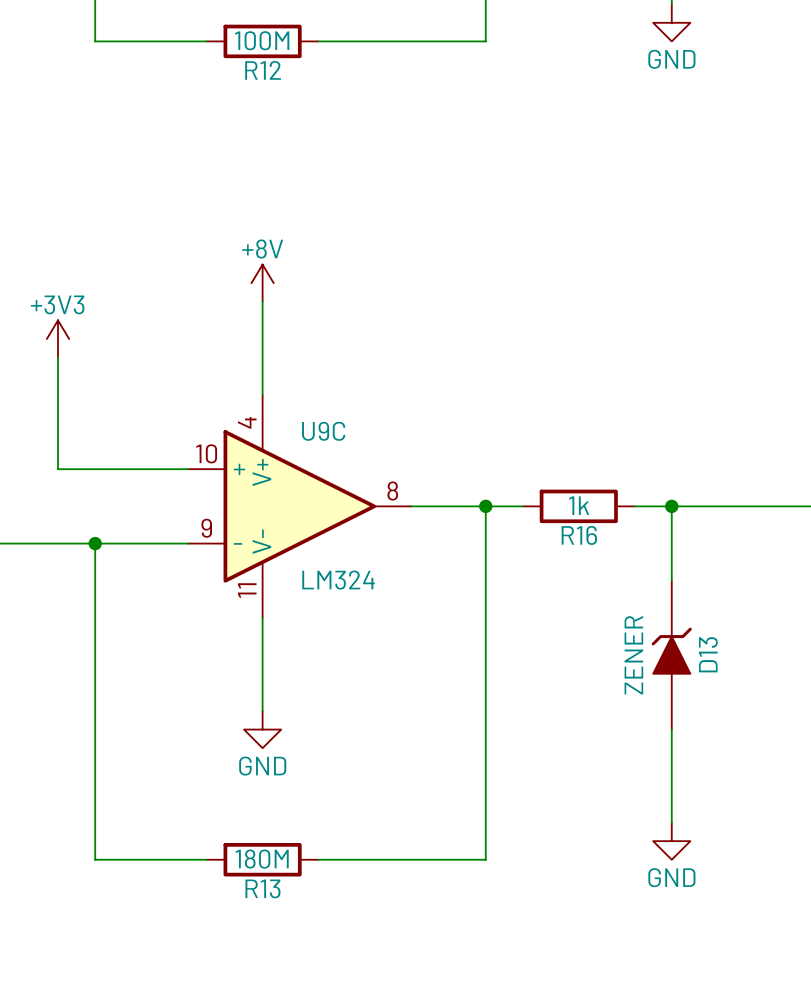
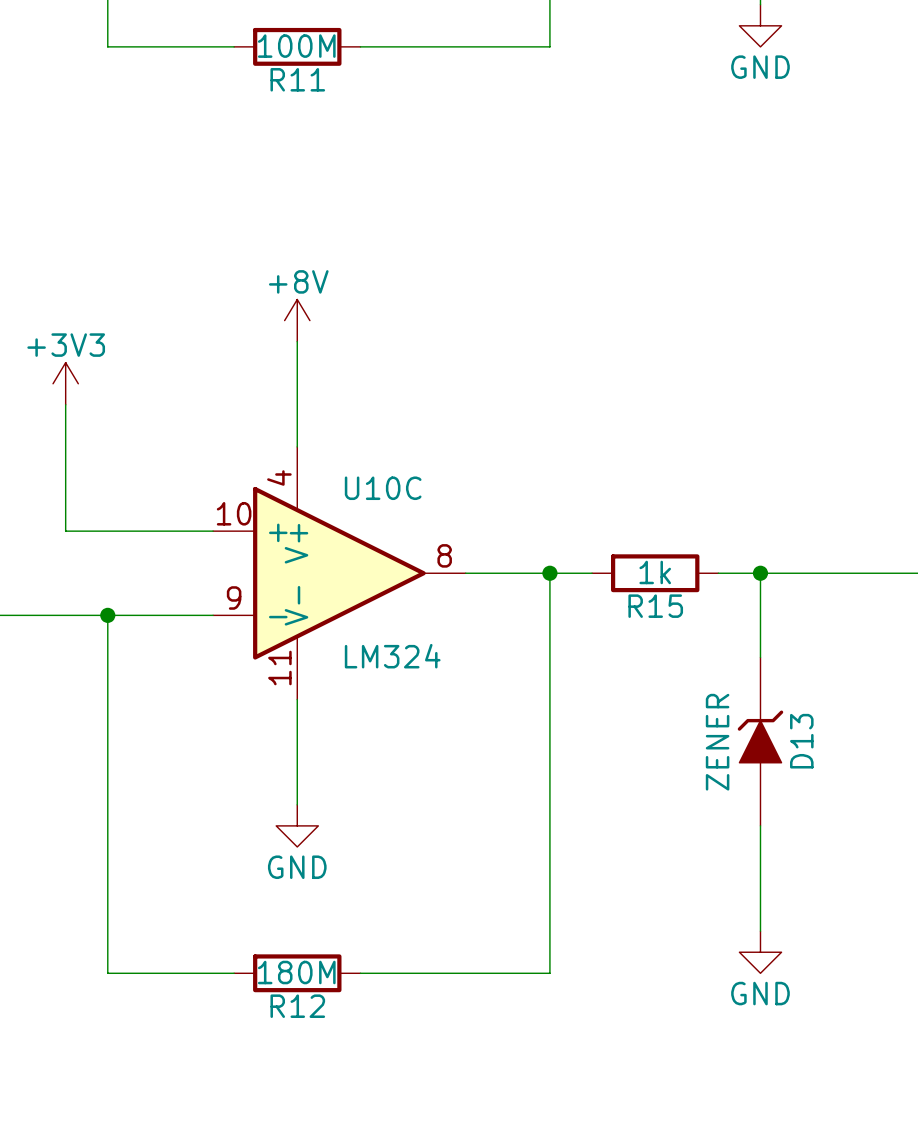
R12 name: R12 (263, 70) -> R11 (297, 79)
U9C name: U9C (323, 431) -> U10C (383, 488)
R16 name: R16 (579, 535) -> R15 (655, 606)
R13 name: R13 (262, 888) -> R12 (297, 1006)

